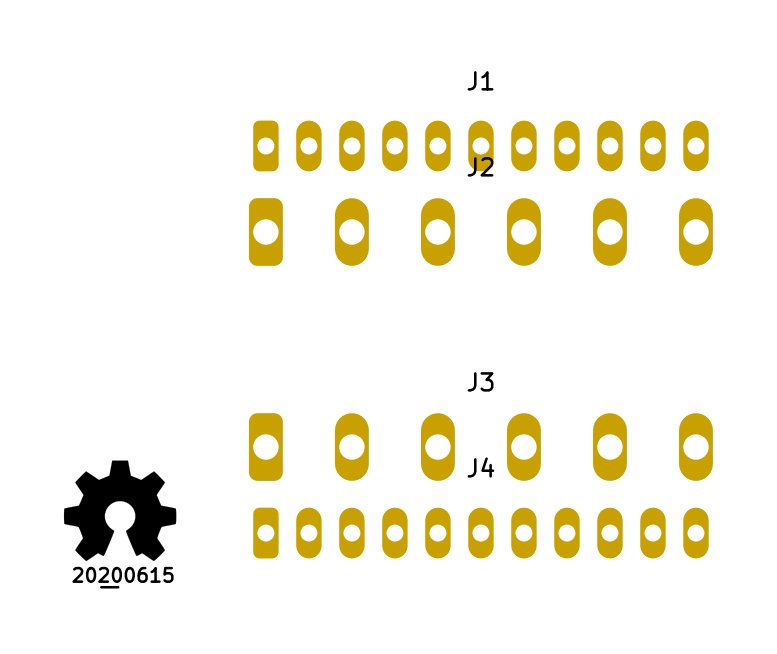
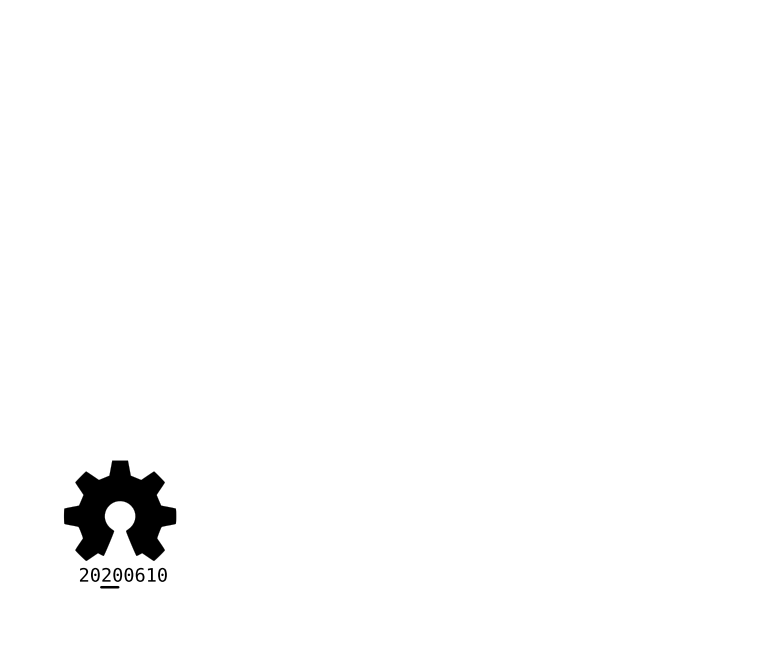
J1: (480, 145) -> none
J2: (480, 232) -> none
J3: (480, 447) -> none
J4: (480, 533) -> none
drawing shape: [72, 566, 174, 589] -> [79, 567, 167, 589]

